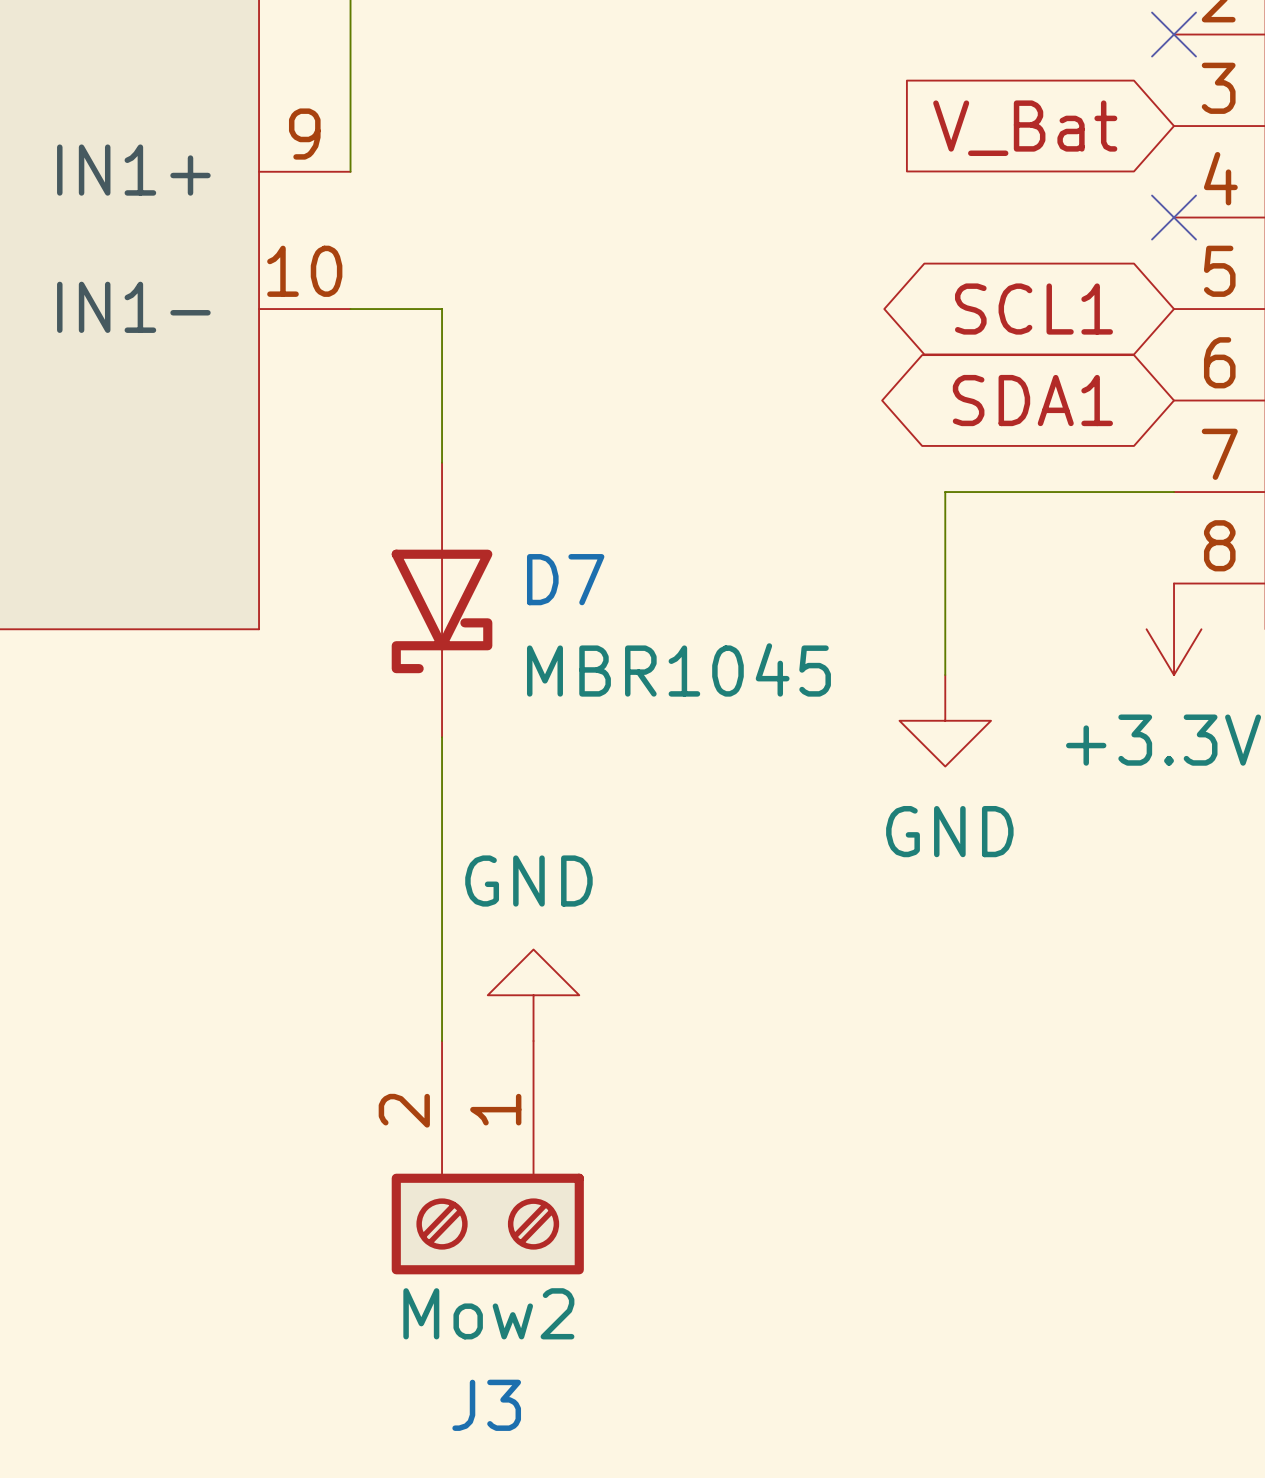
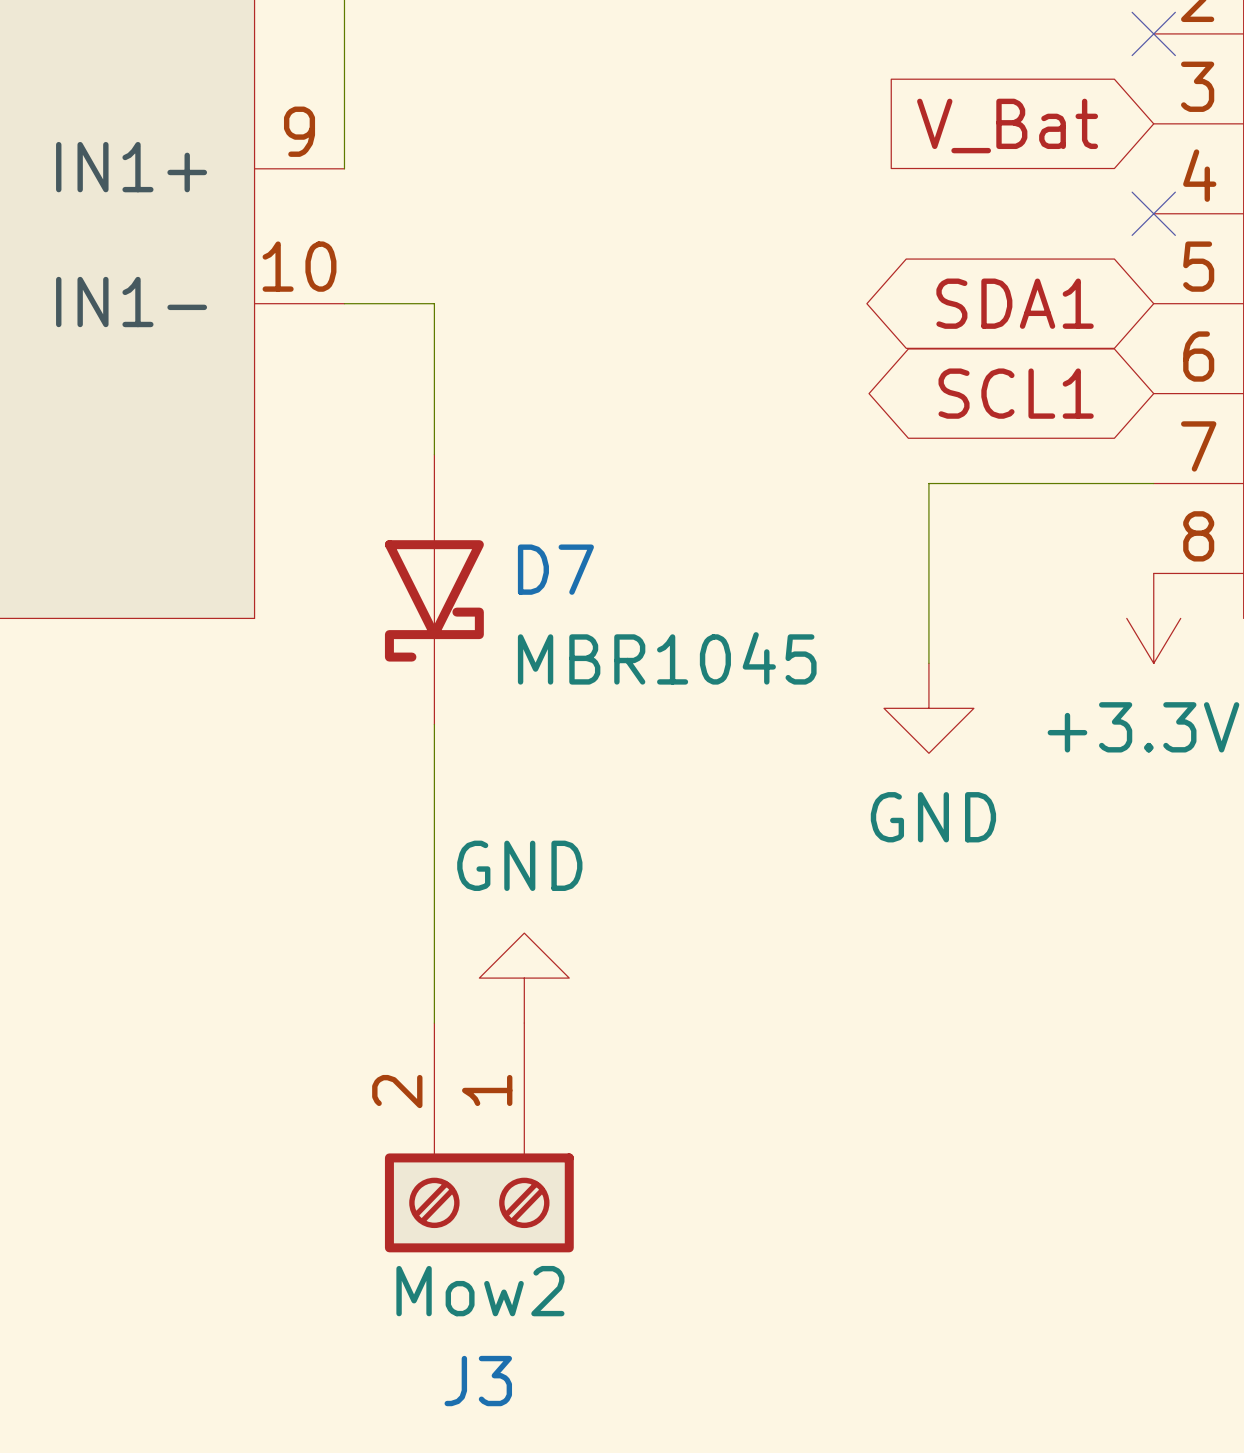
global label: SCL1 (1033, 309) -> SDA1 (1015, 303)
global label: SDA1 (1032, 400) -> SCL1 (1016, 393)

